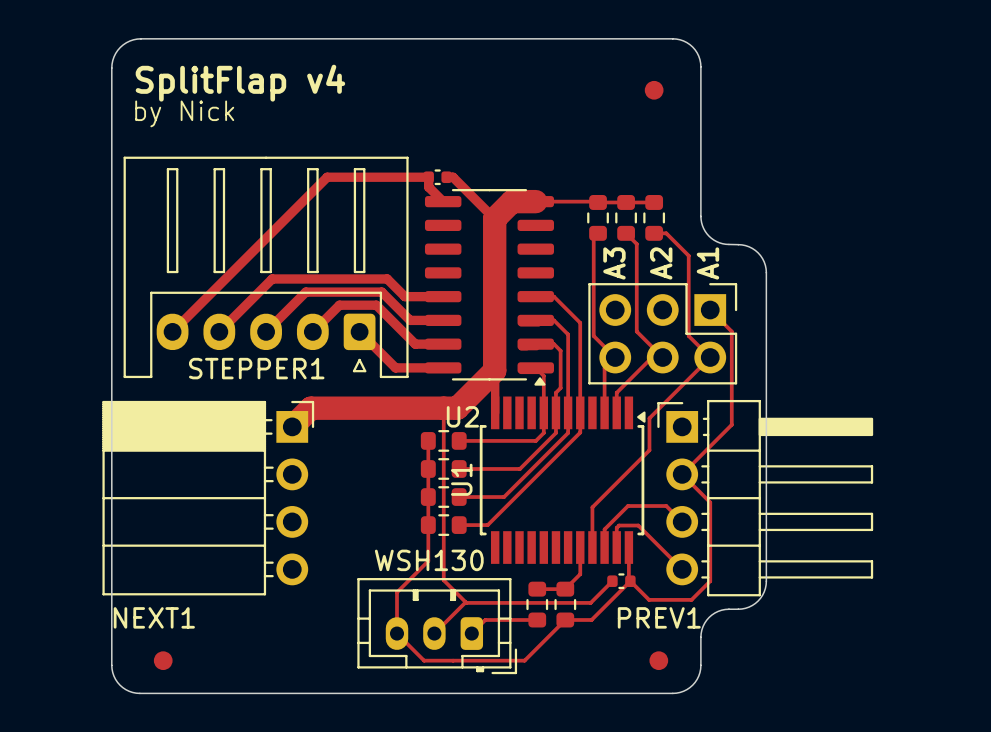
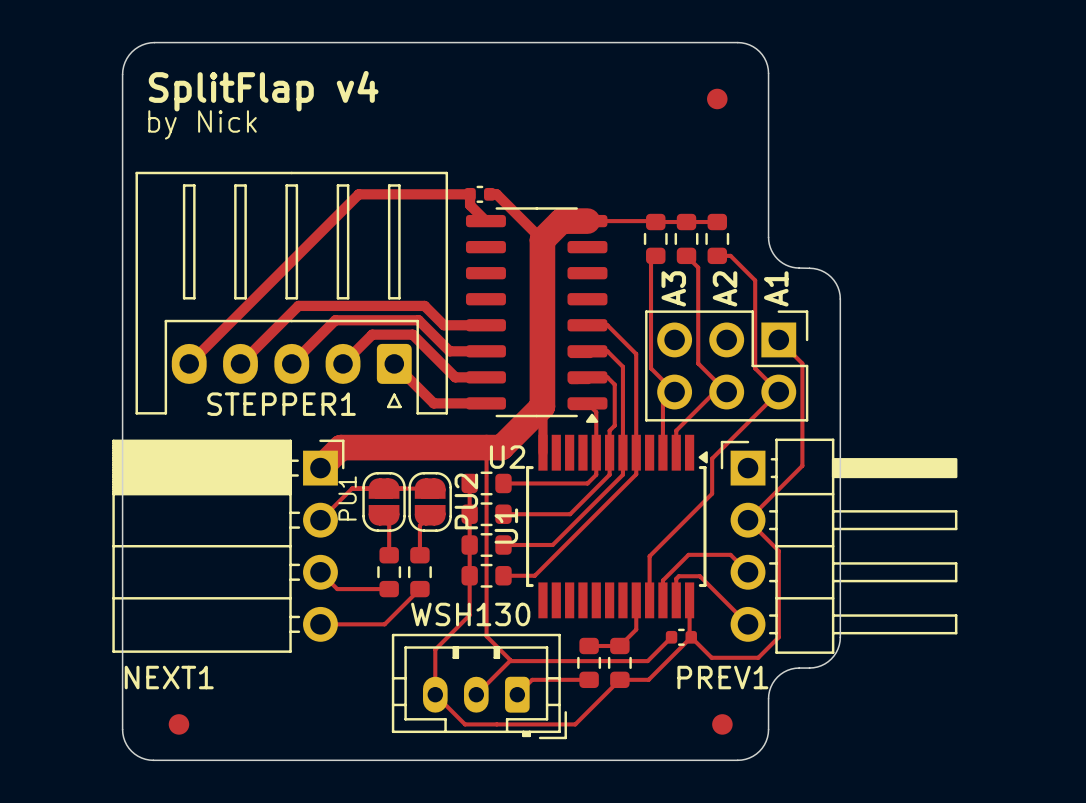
track: none -> (430, 488) (352, 488) (320, 520)
PU1: none -> (384, 501)
PU2: none -> (430, 501)
track: none -> (384, 515) (389, 520) (389, 555)
track: none -> (430, 515) (419, 525) (419, 555)
track: none -> (320, 572) (337, 589) (389, 589)
part: none -> (389, 572)
part: none -> (419, 572)
track: none -> (419, 589) (384, 624) (320, 624)

